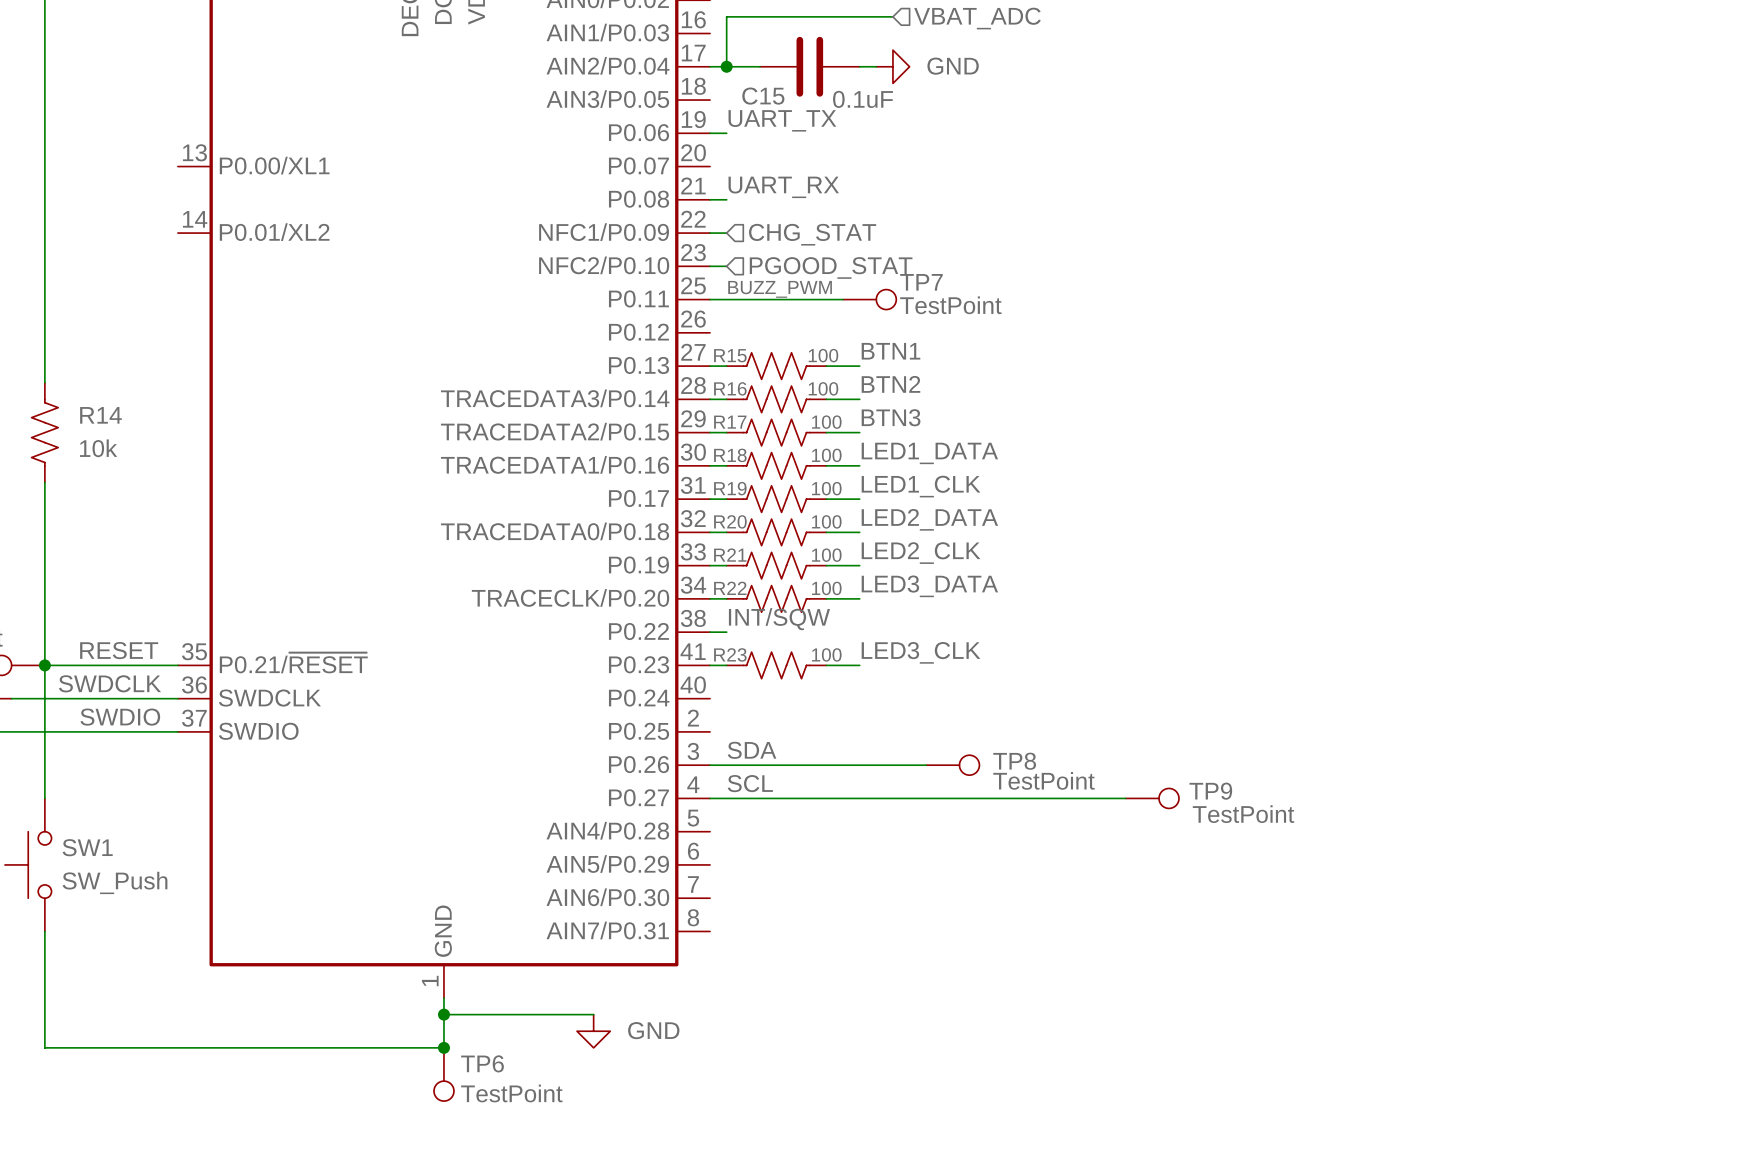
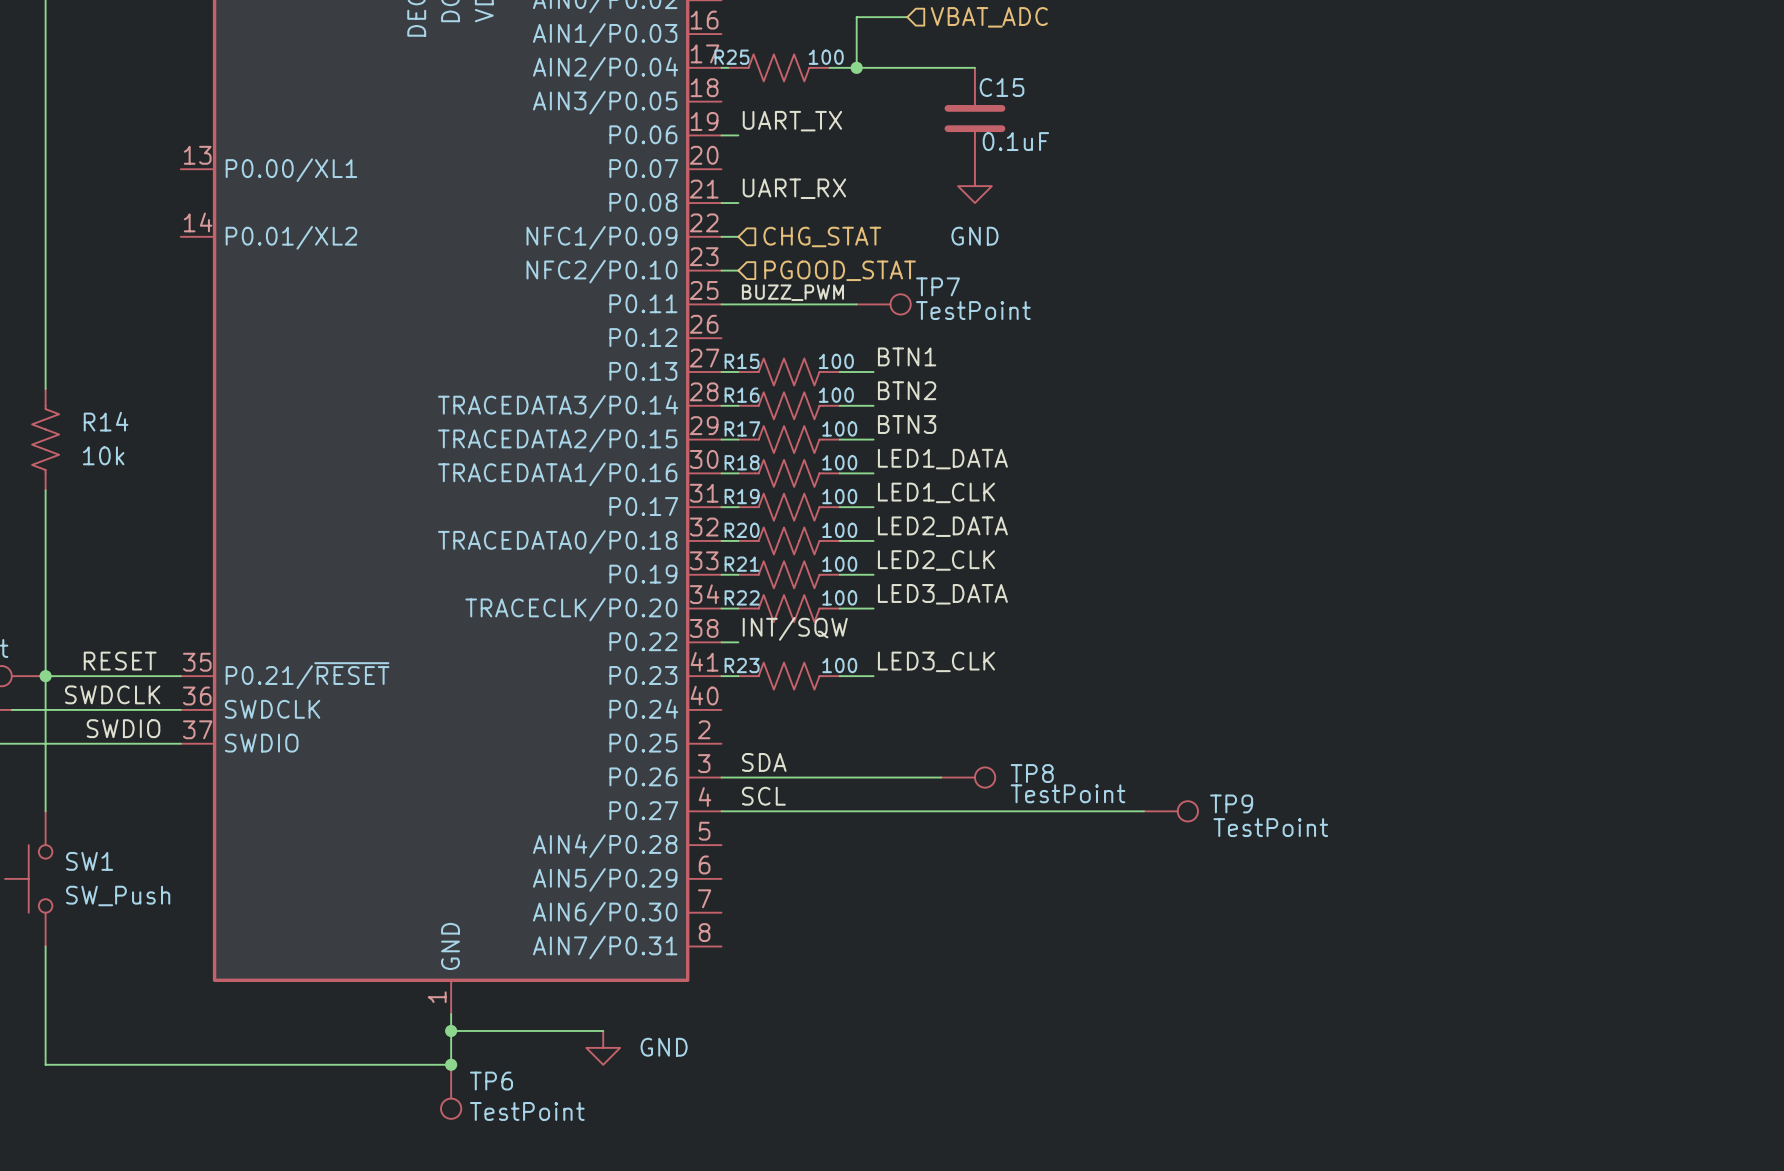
wire: (843, 16) (726, 16) (726, 66) -> (856, 17) (856, 67)
junction: (726, 66) -> none
R25: none -> 100 (778, 67)
C15 rotation: 0° (809, 66) -> 90° clockwise (974, 118)
C15 position: (809, 66) -> (974, 118)
junction: none -> (856, 67)
wire: none -> (890, 67) (974, 67)
power symbol rotation: 0° (892, 66) -> 90° clockwise (974, 186)
power symbol position: GND (892, 66) -> GND (974, 186)
C15 name position: C15 (763, 96) -> C15 (1001, 87)

